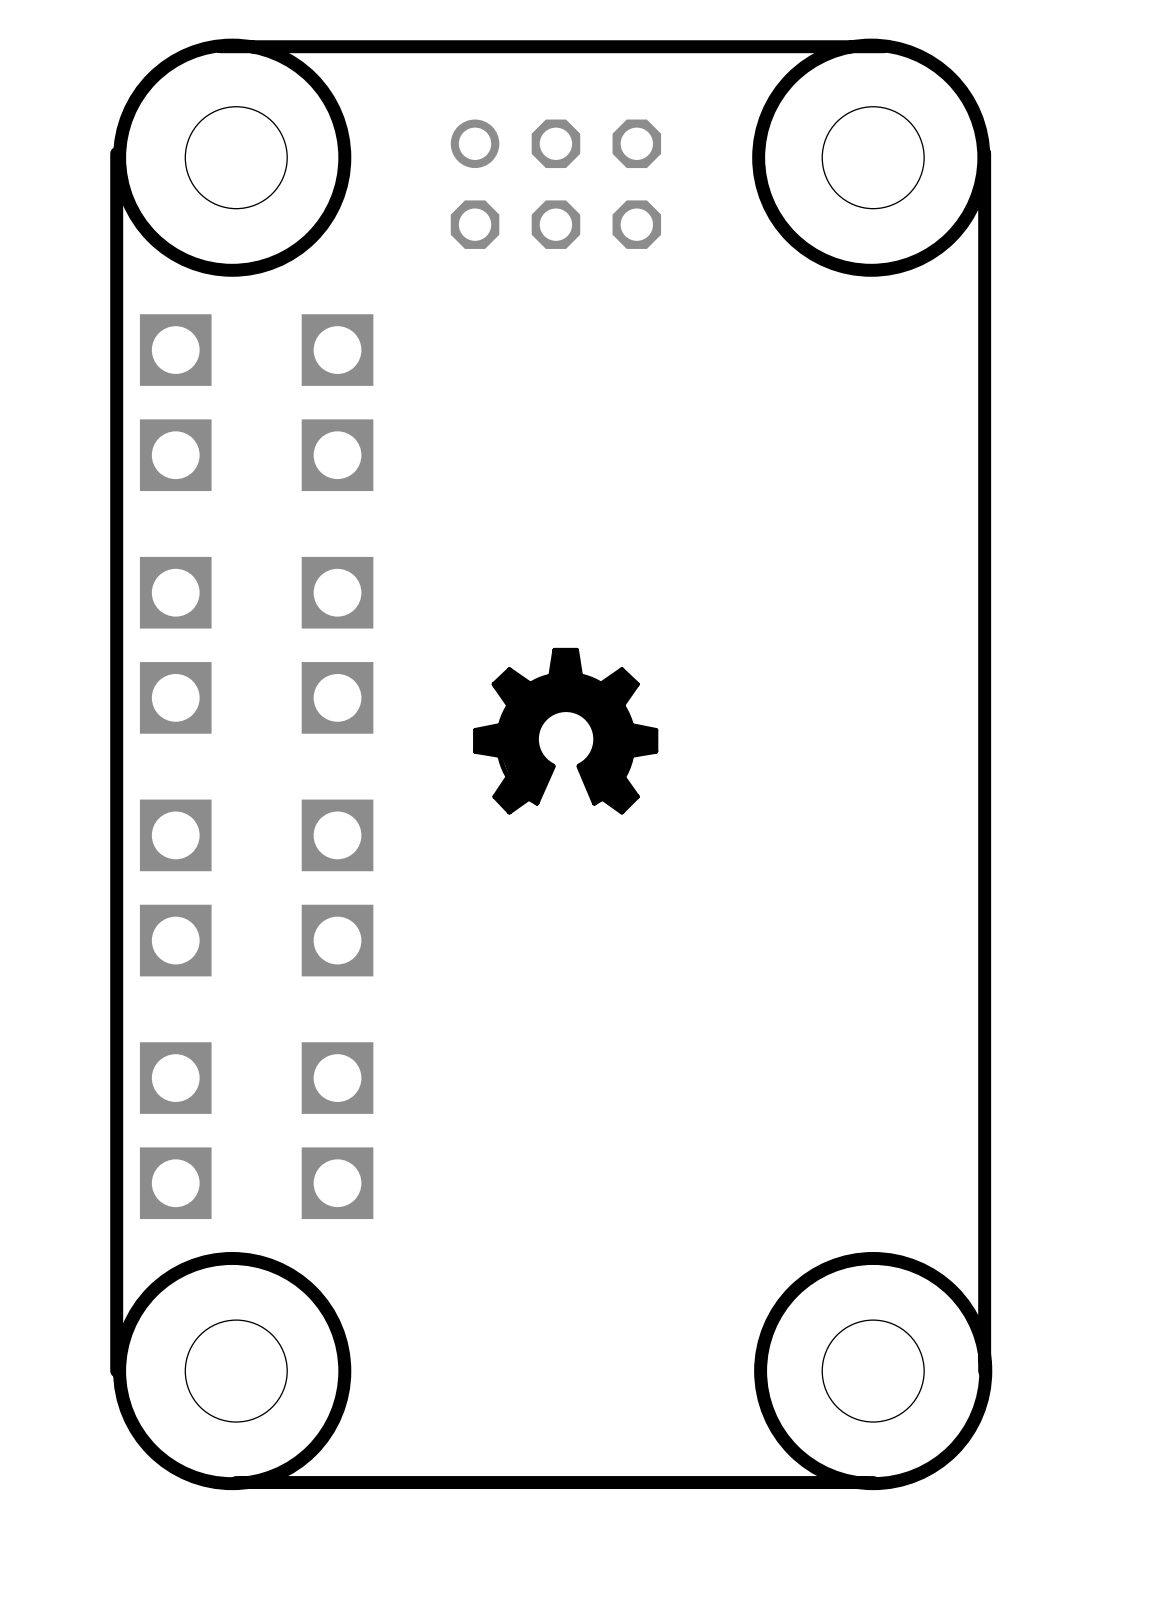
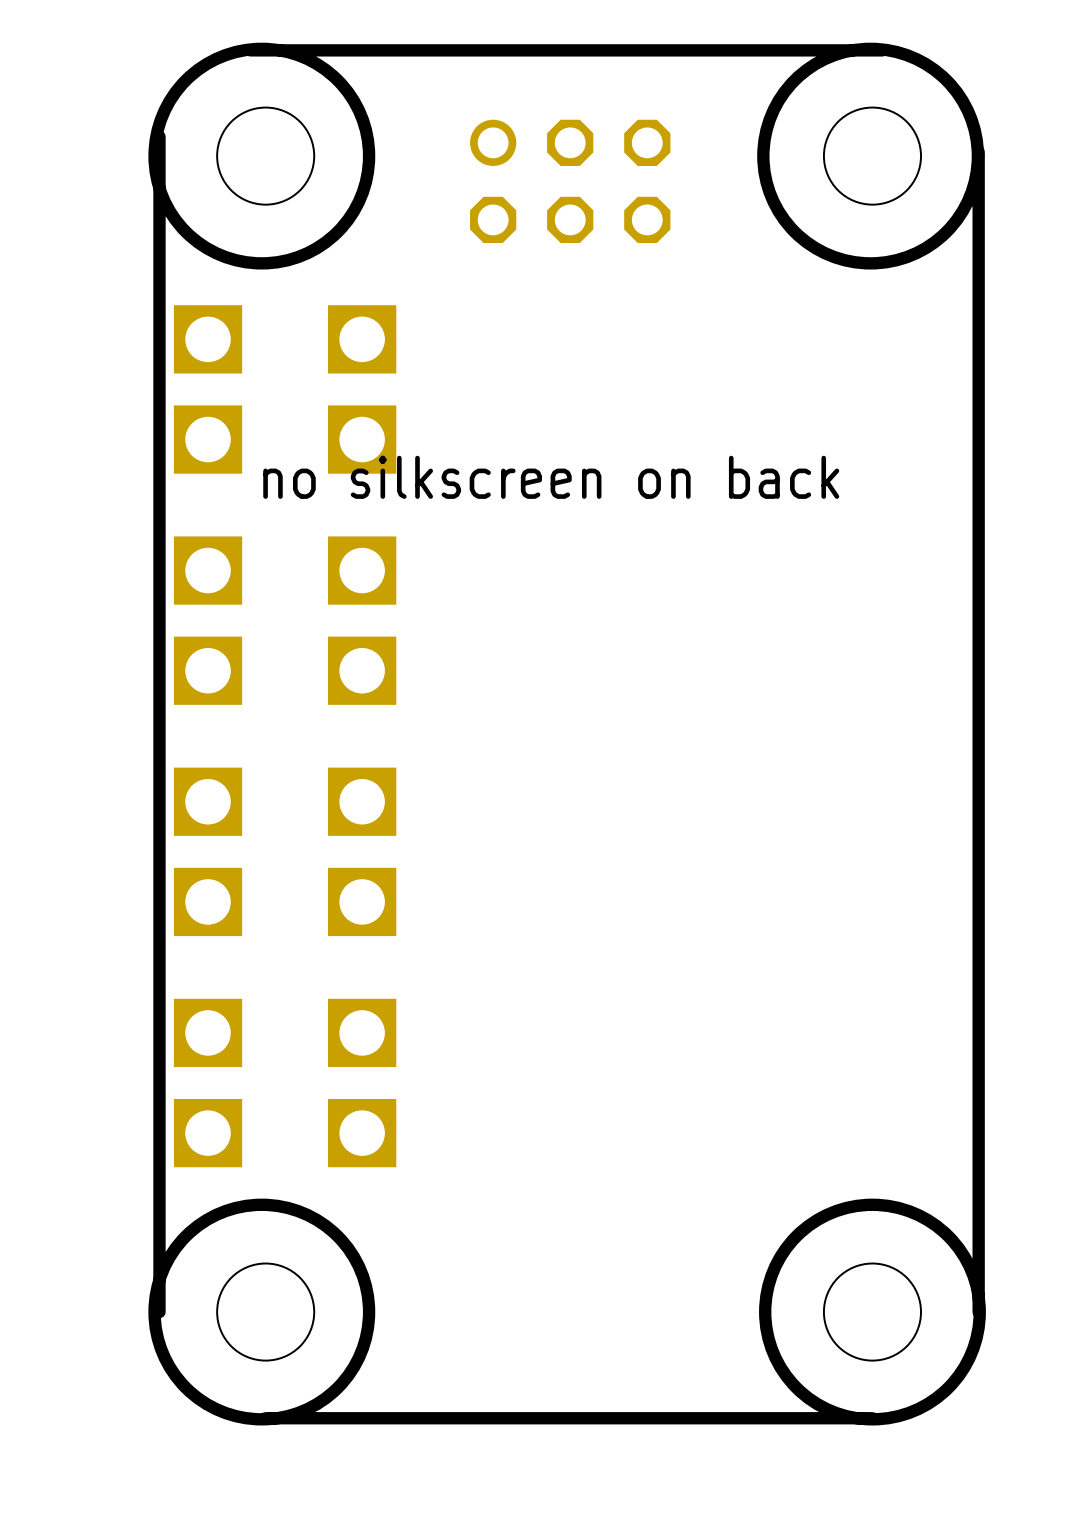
board edge: none -> (159, 136) (159, 1312)
board edge: (116, 153) (116, 1371) -> none
text: none -> no silkscreen on back (551, 477)
drawing: [473, 647, 659, 815] -> none

